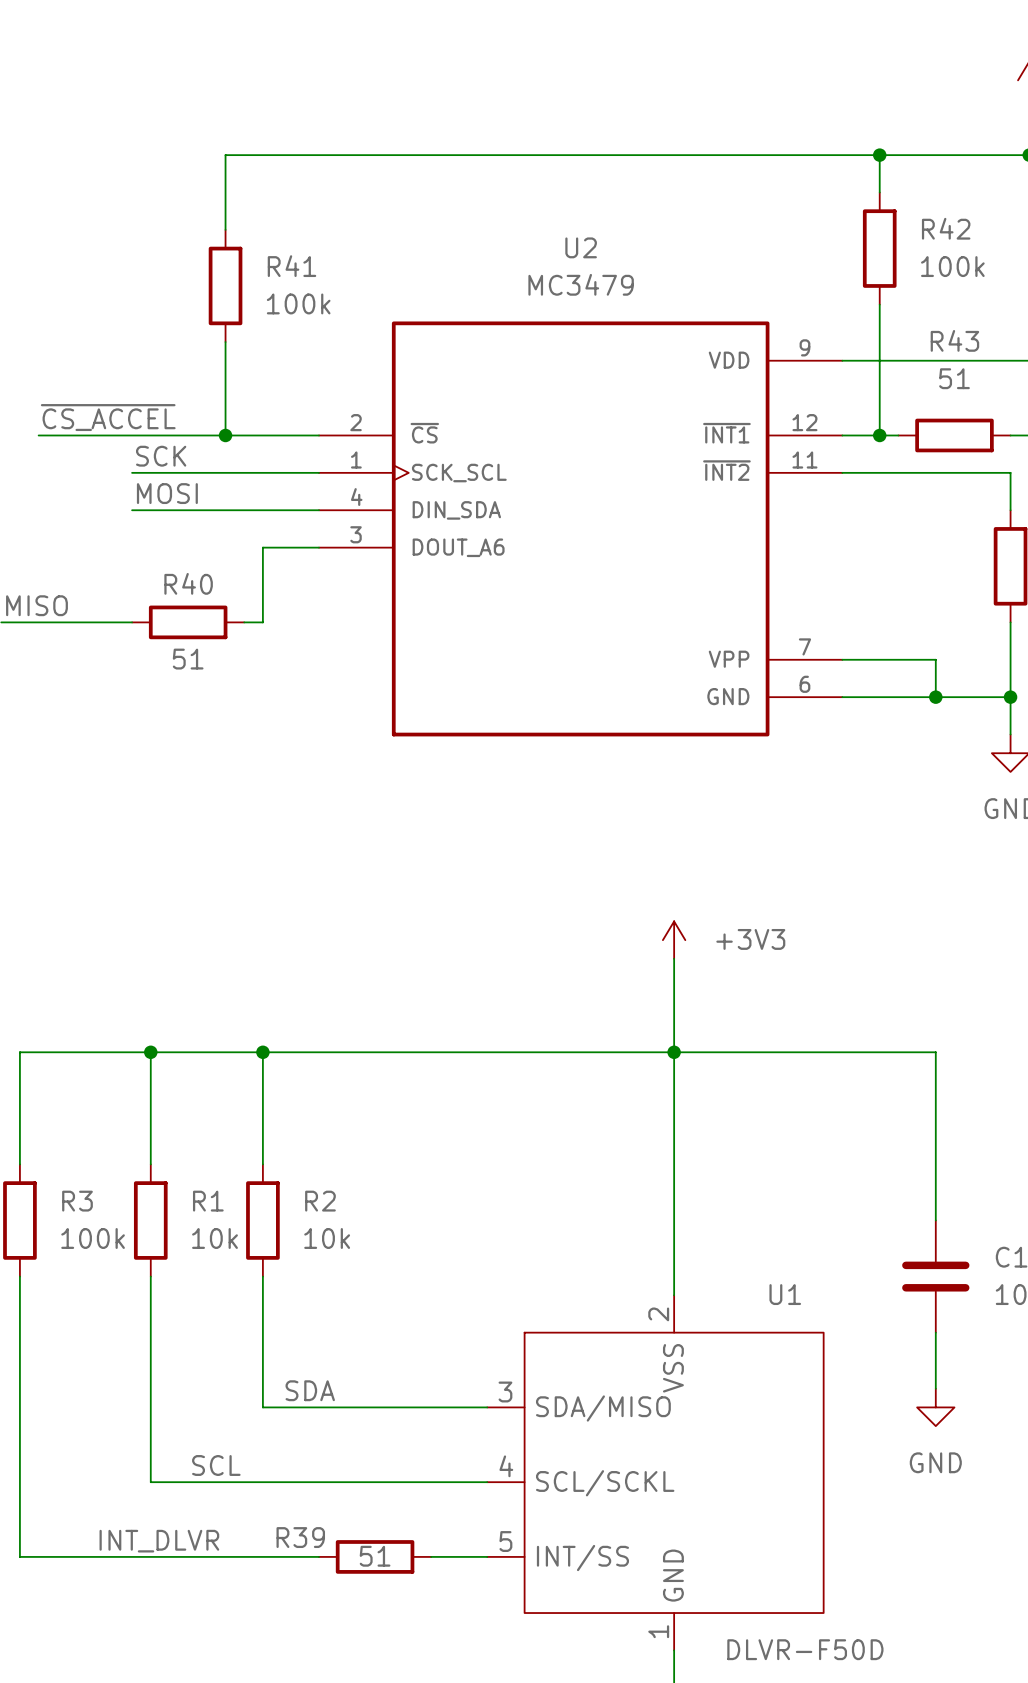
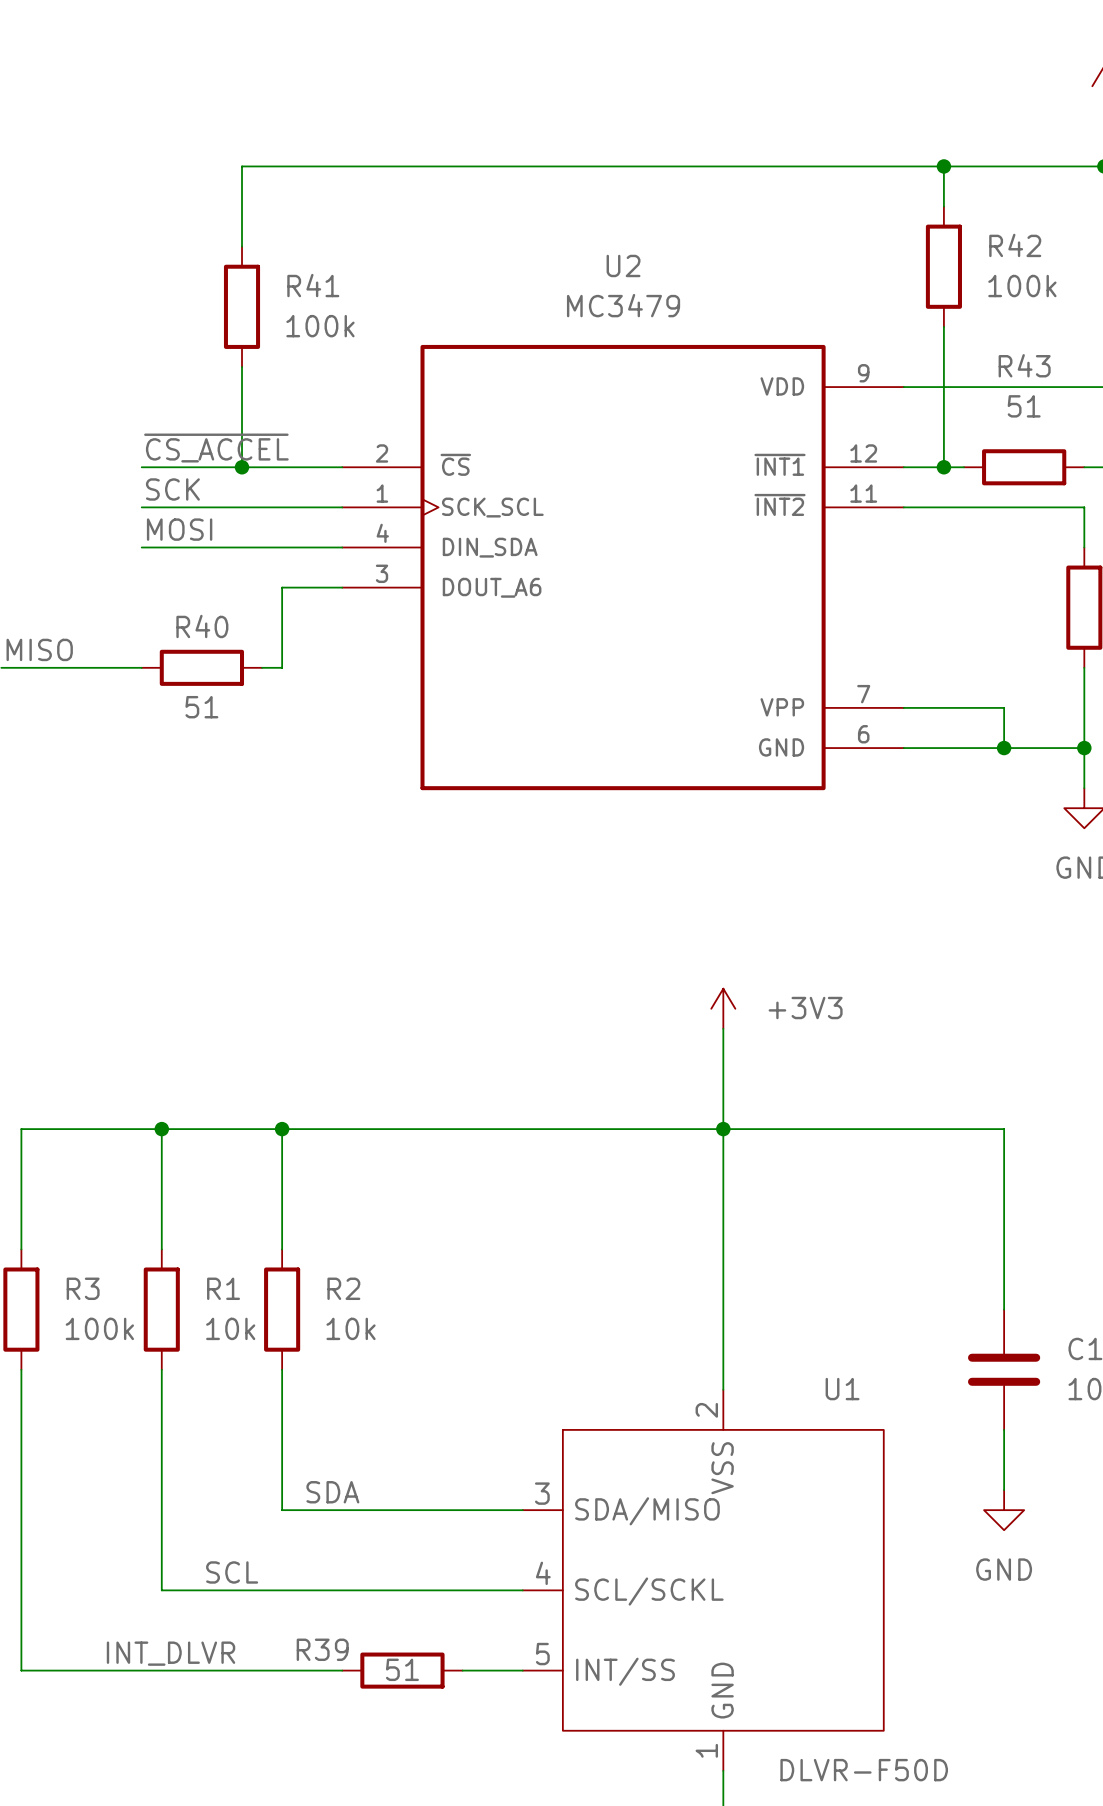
label position: ~{CS_ACCEL} (108, 417) -> ~{CS_ACCEL} (216, 448)
wire: (38, 435) (132, 435) -> none

